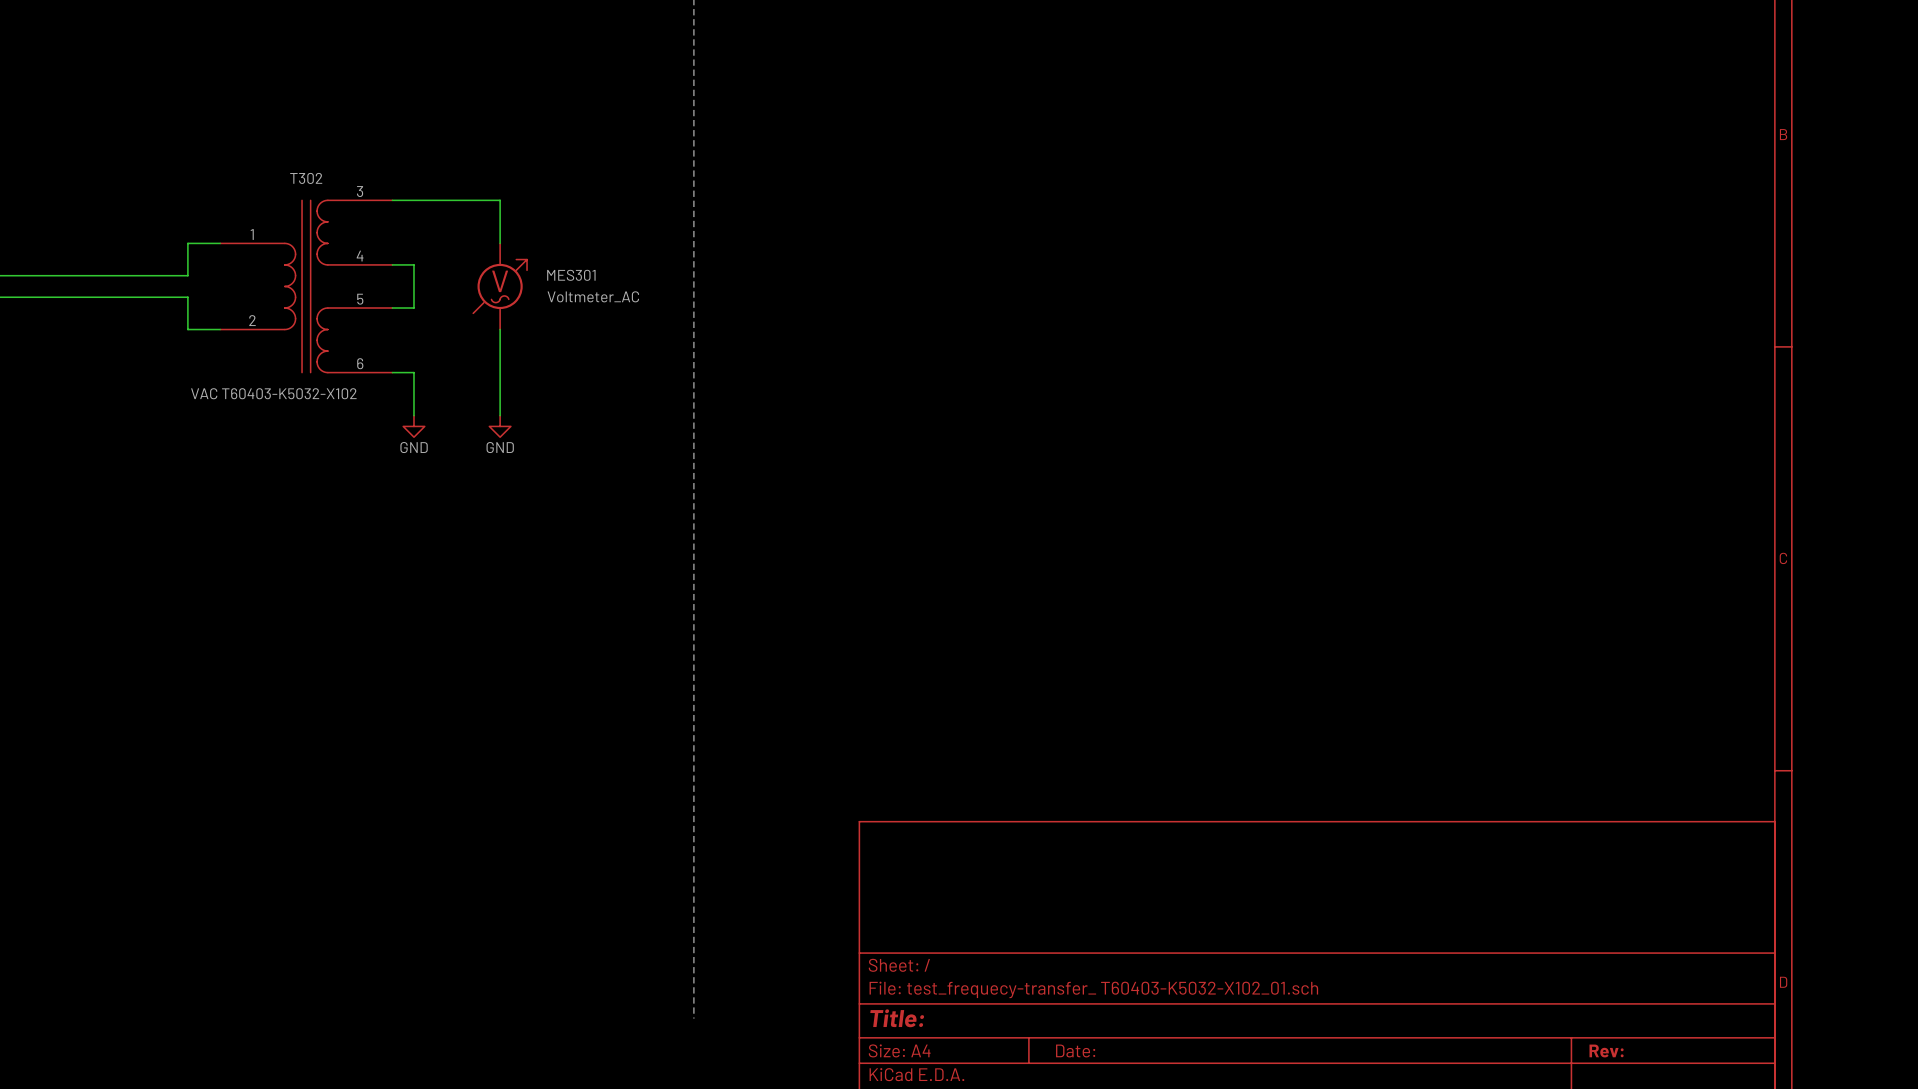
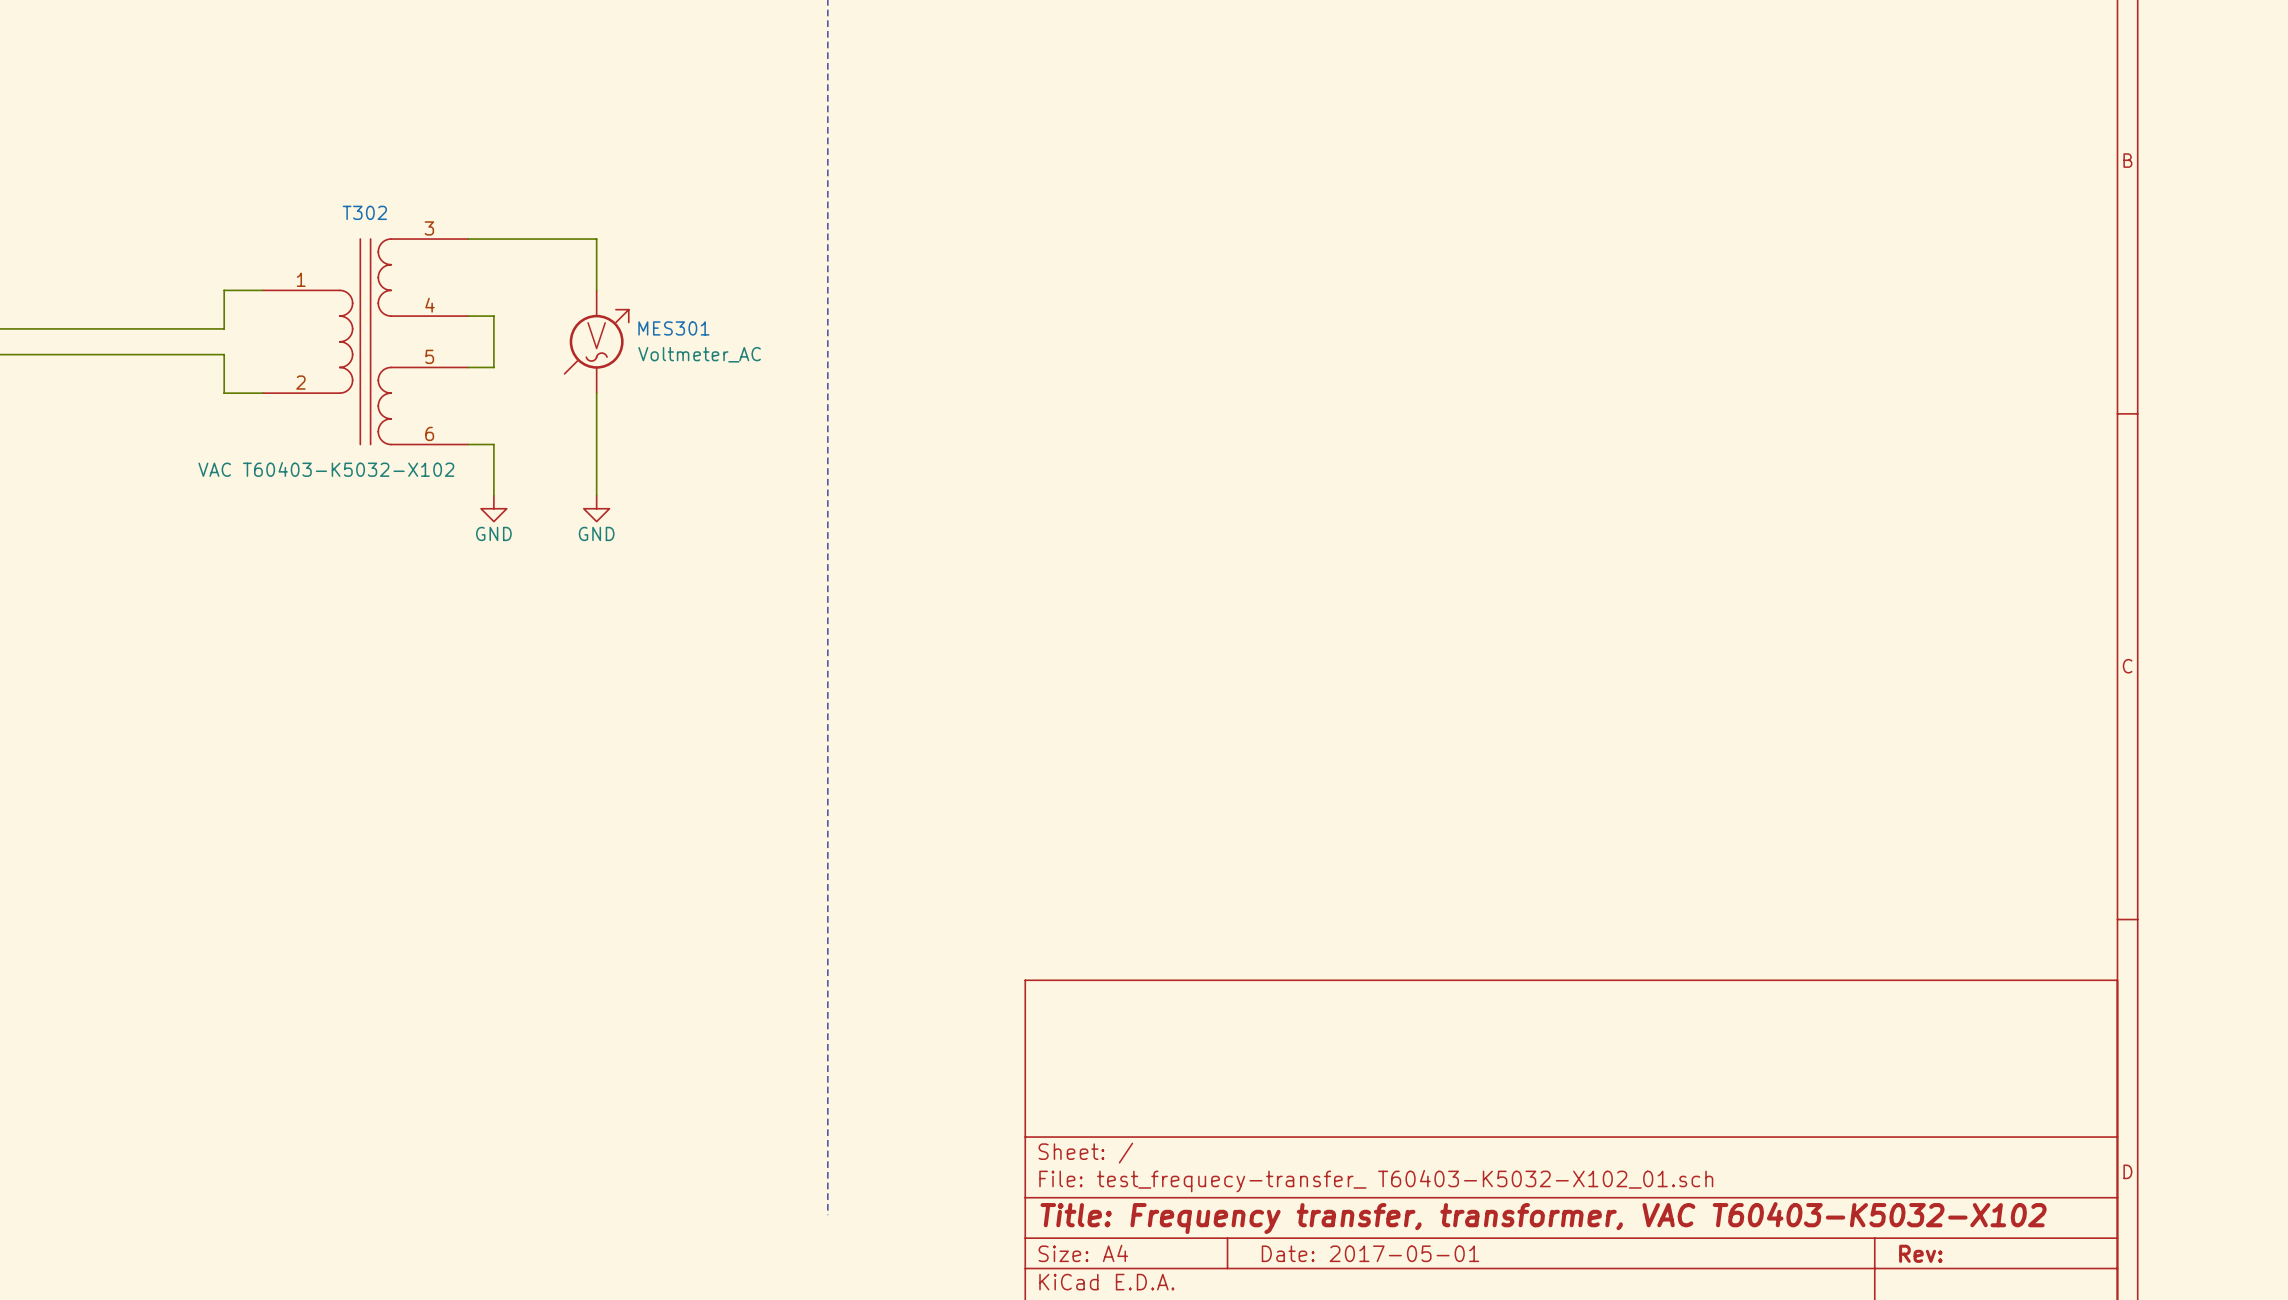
title block: Title: (897, 1018) -> Title: Frequency transfer, transformer, VAC T60403-K5032-X102 (1543, 1218)
title block: Date: (1075, 1051) -> Date: 2017-05-01 (1370, 1253)

